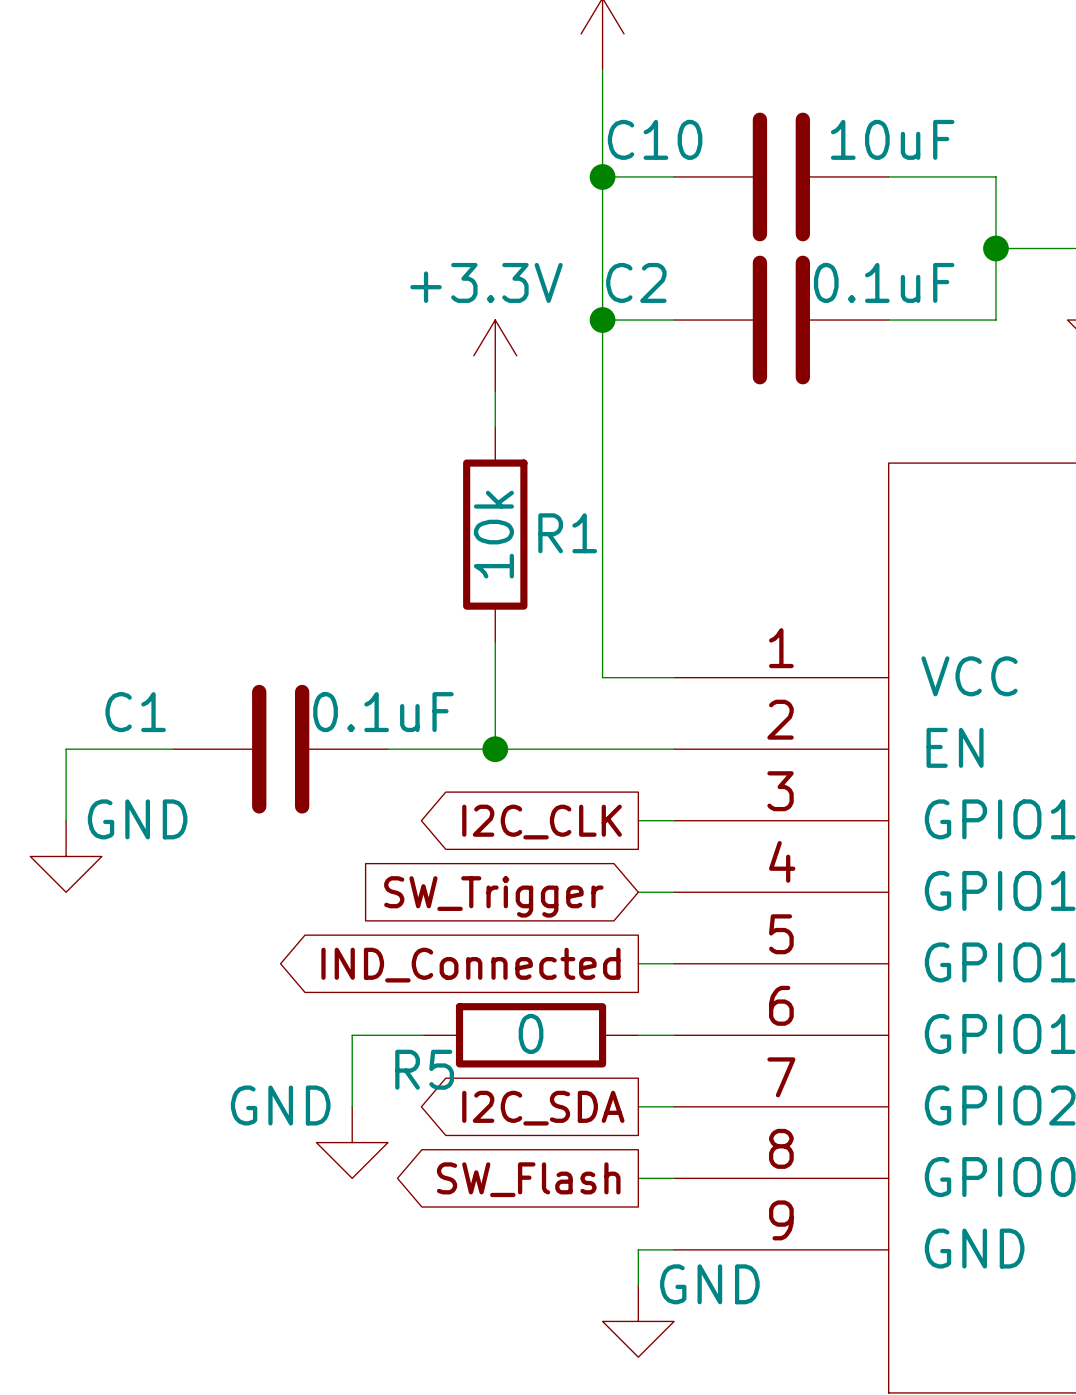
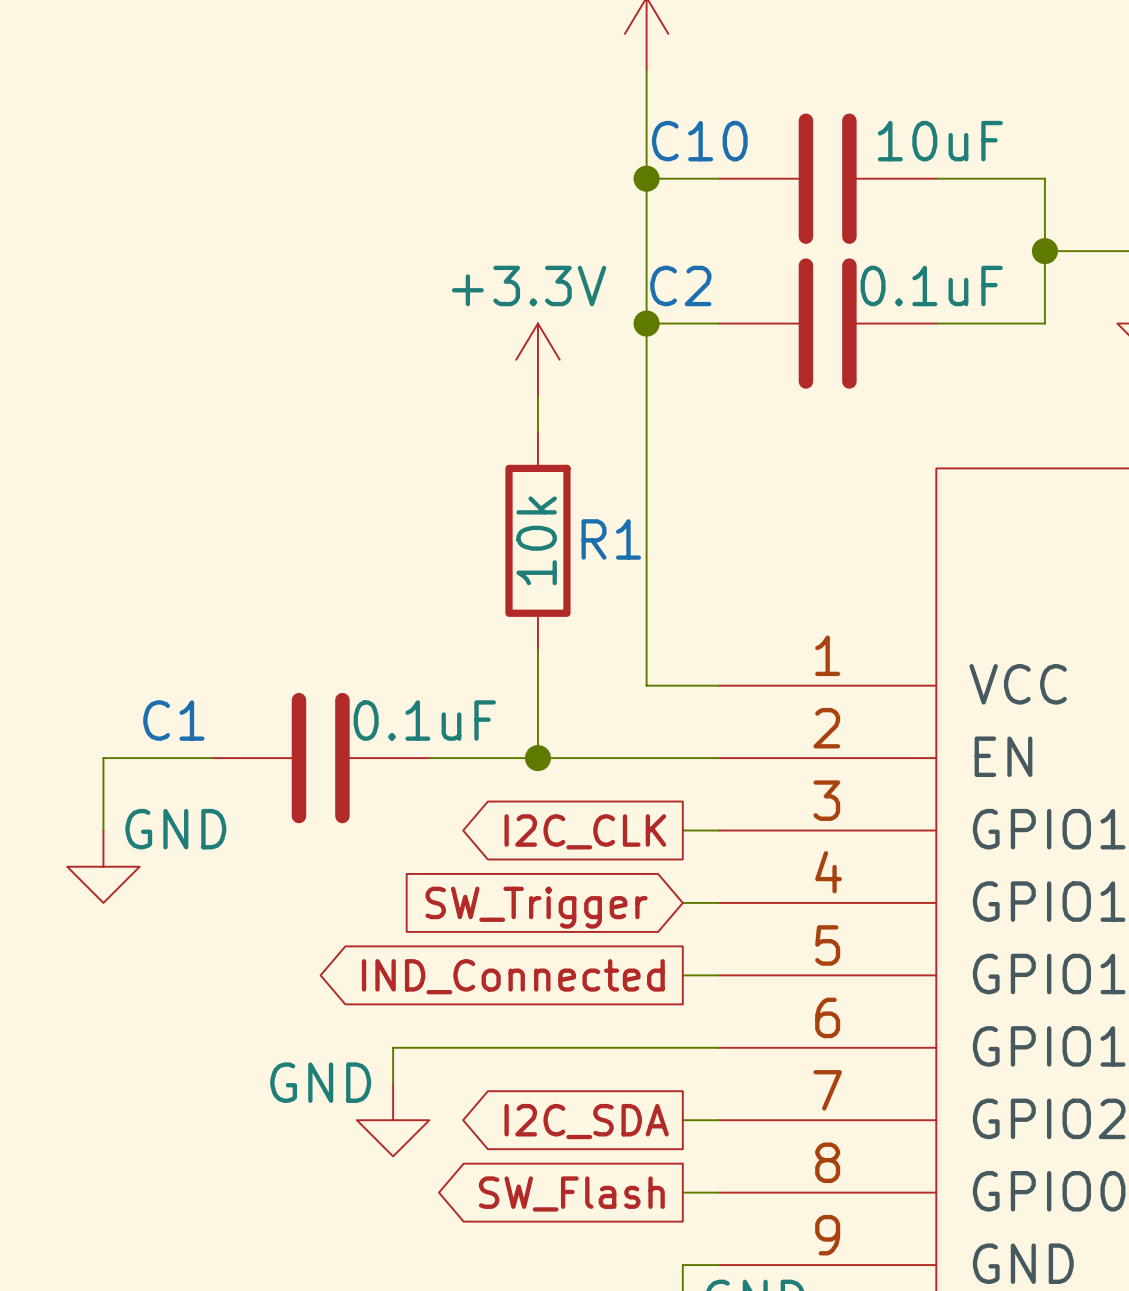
wire: none -> (465, 1047) (682, 1047)
R5: 0 (531, 1035) -> none
power symbol position: GND (352, 1142) -> GND (393, 1120)

